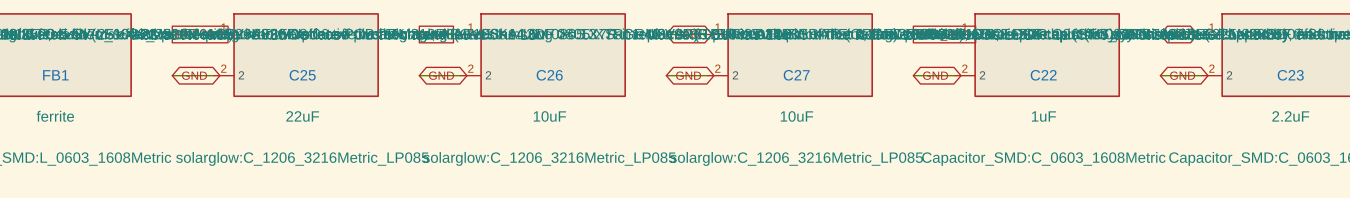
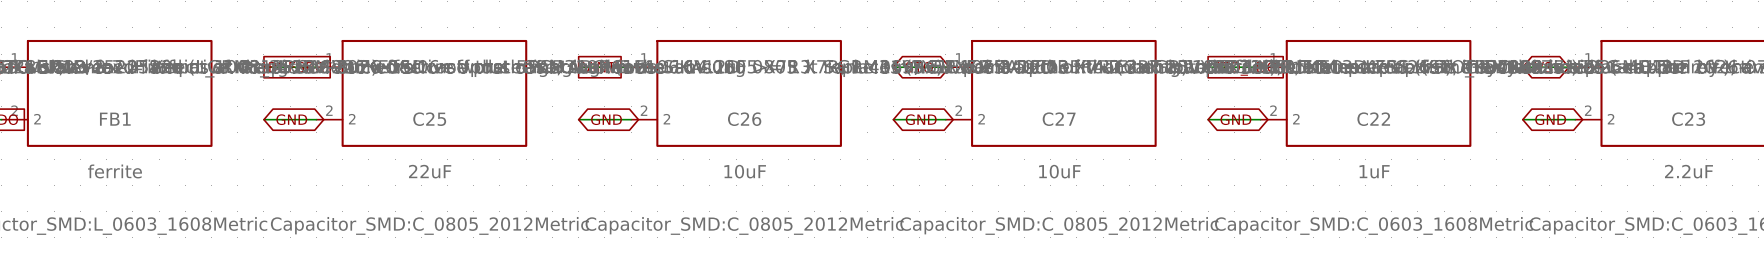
C25 text: solarglow:C_1206_3216Metric_LP085 (302, 158) -> Capacitor_SMD:C_0805_2012Metric (429, 225)
C26 text: solarglow:C_1206_3216Metric_LP085 (549, 158) -> Capacitor_SMD:C_0805_2012Metric (744, 225)
C27 text: solarglow:C_1206_3216Metric_LP085 (796, 158) -> Capacitor_SMD:C_0805_2012Metric (1059, 225)

